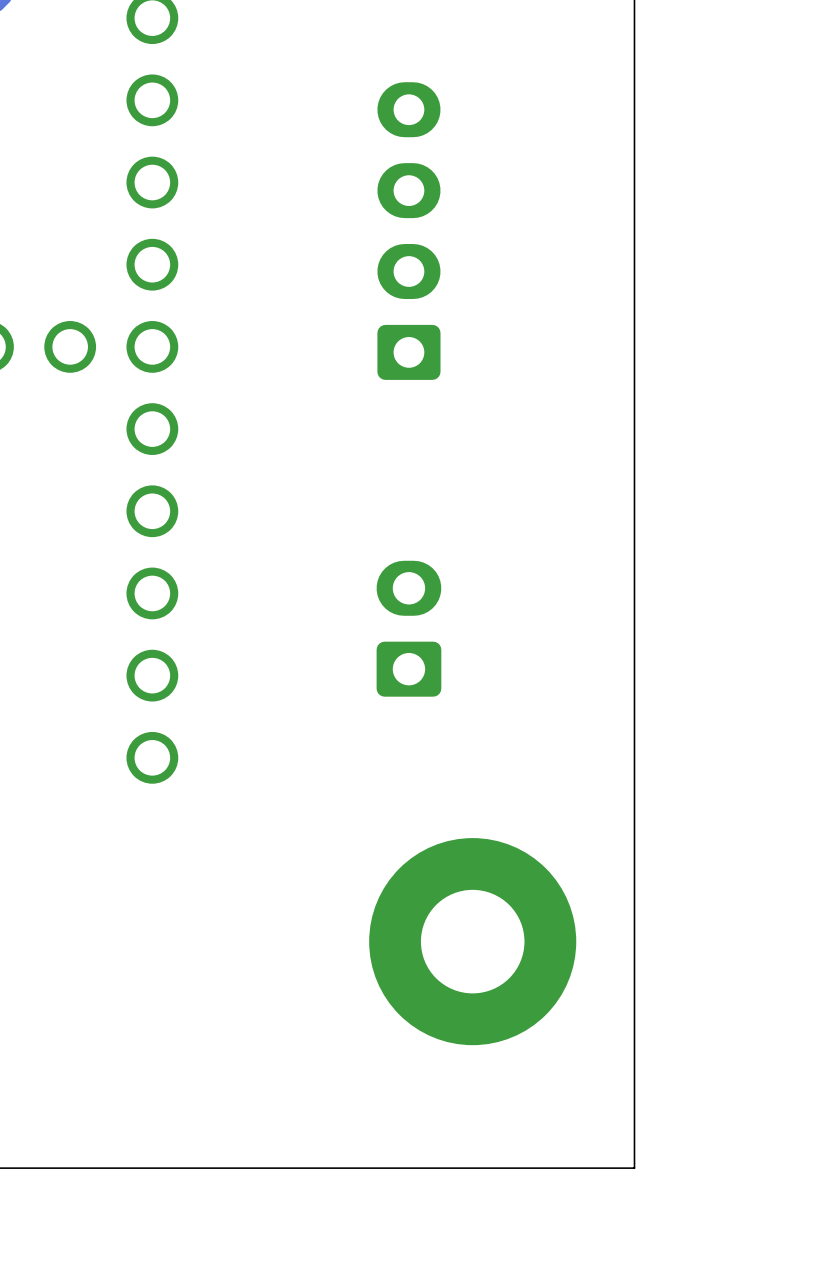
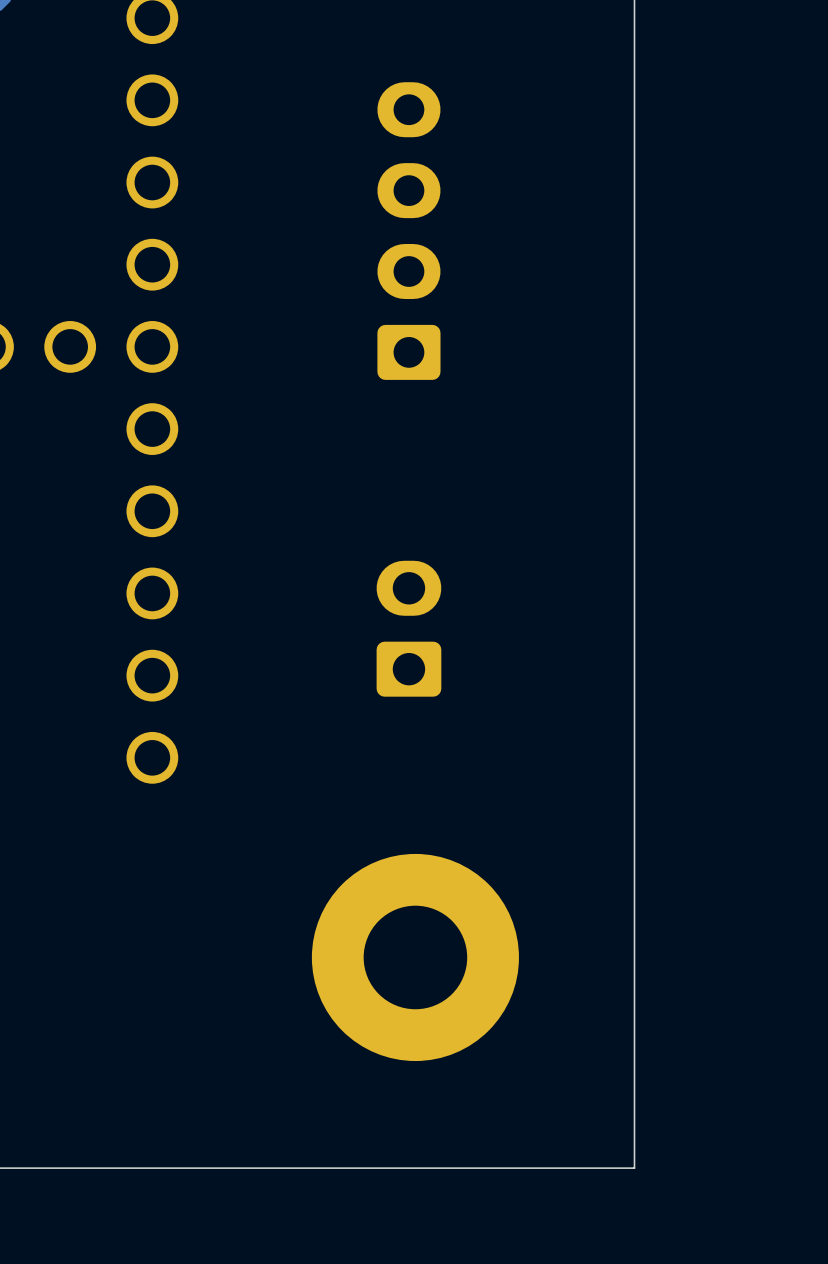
part position: (472, 941) -> (415, 957)

